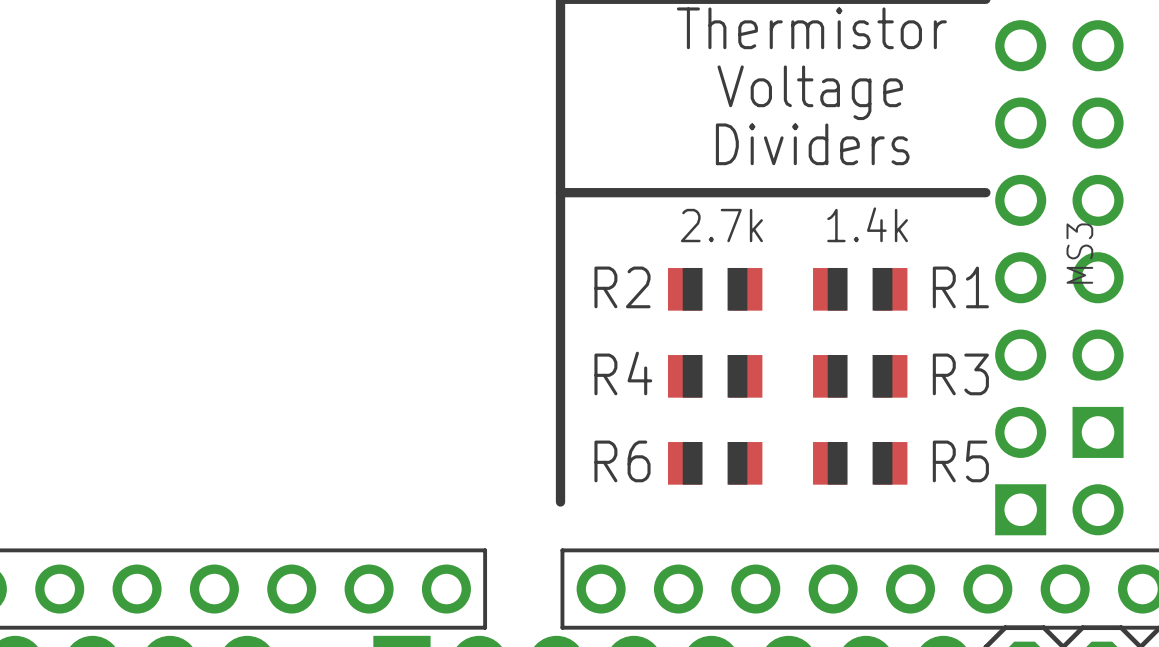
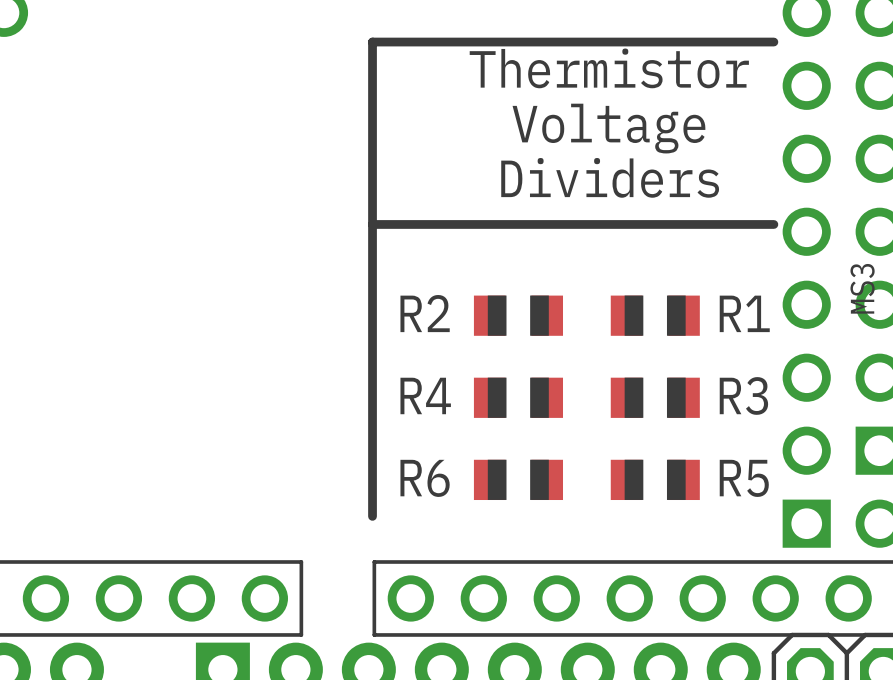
text: 1.4k (867, 224) -> none
text: 2.7k (721, 225) -> none

